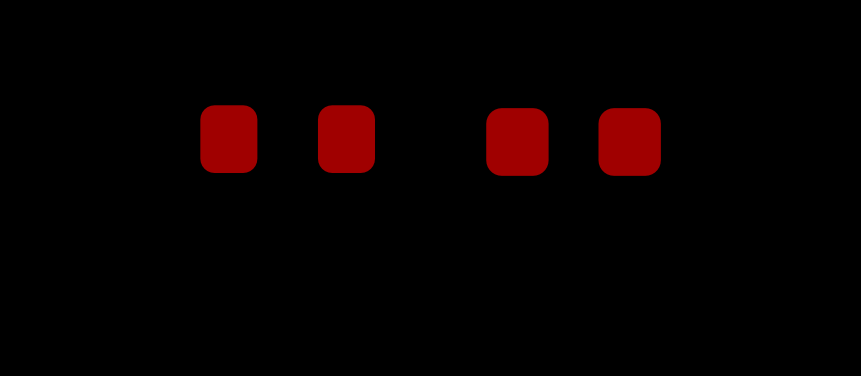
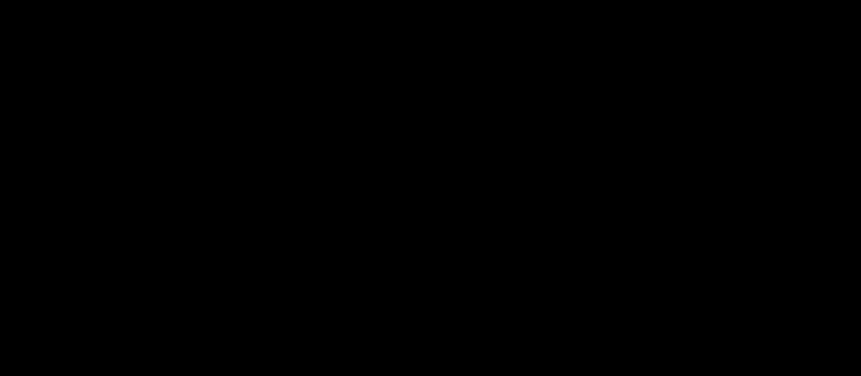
part: (287, 139) -> none
part: (573, 141) -> none

